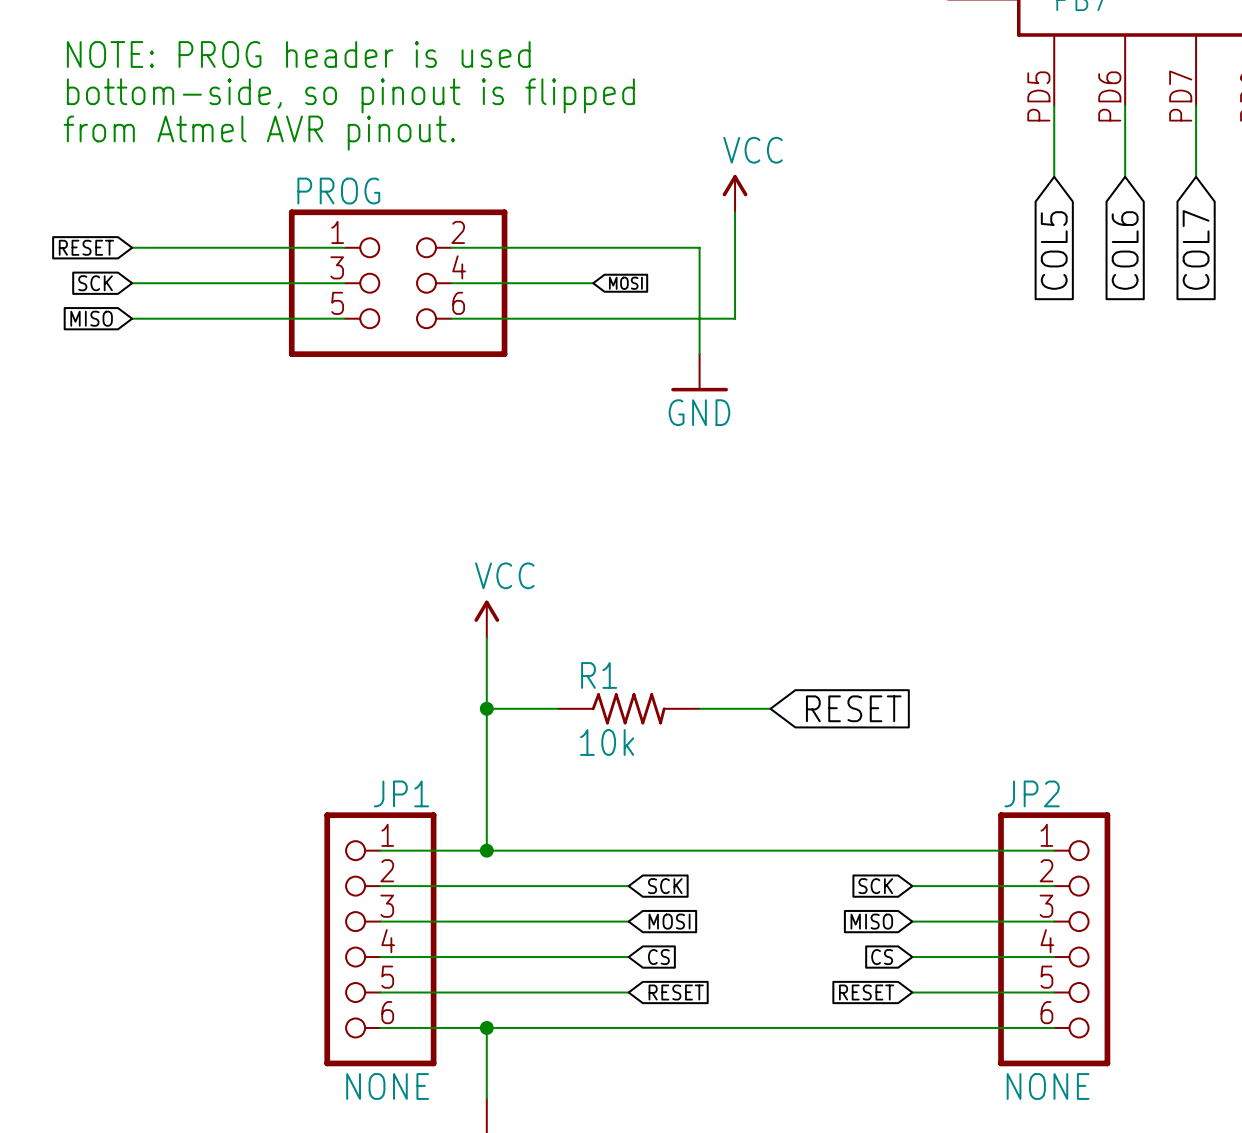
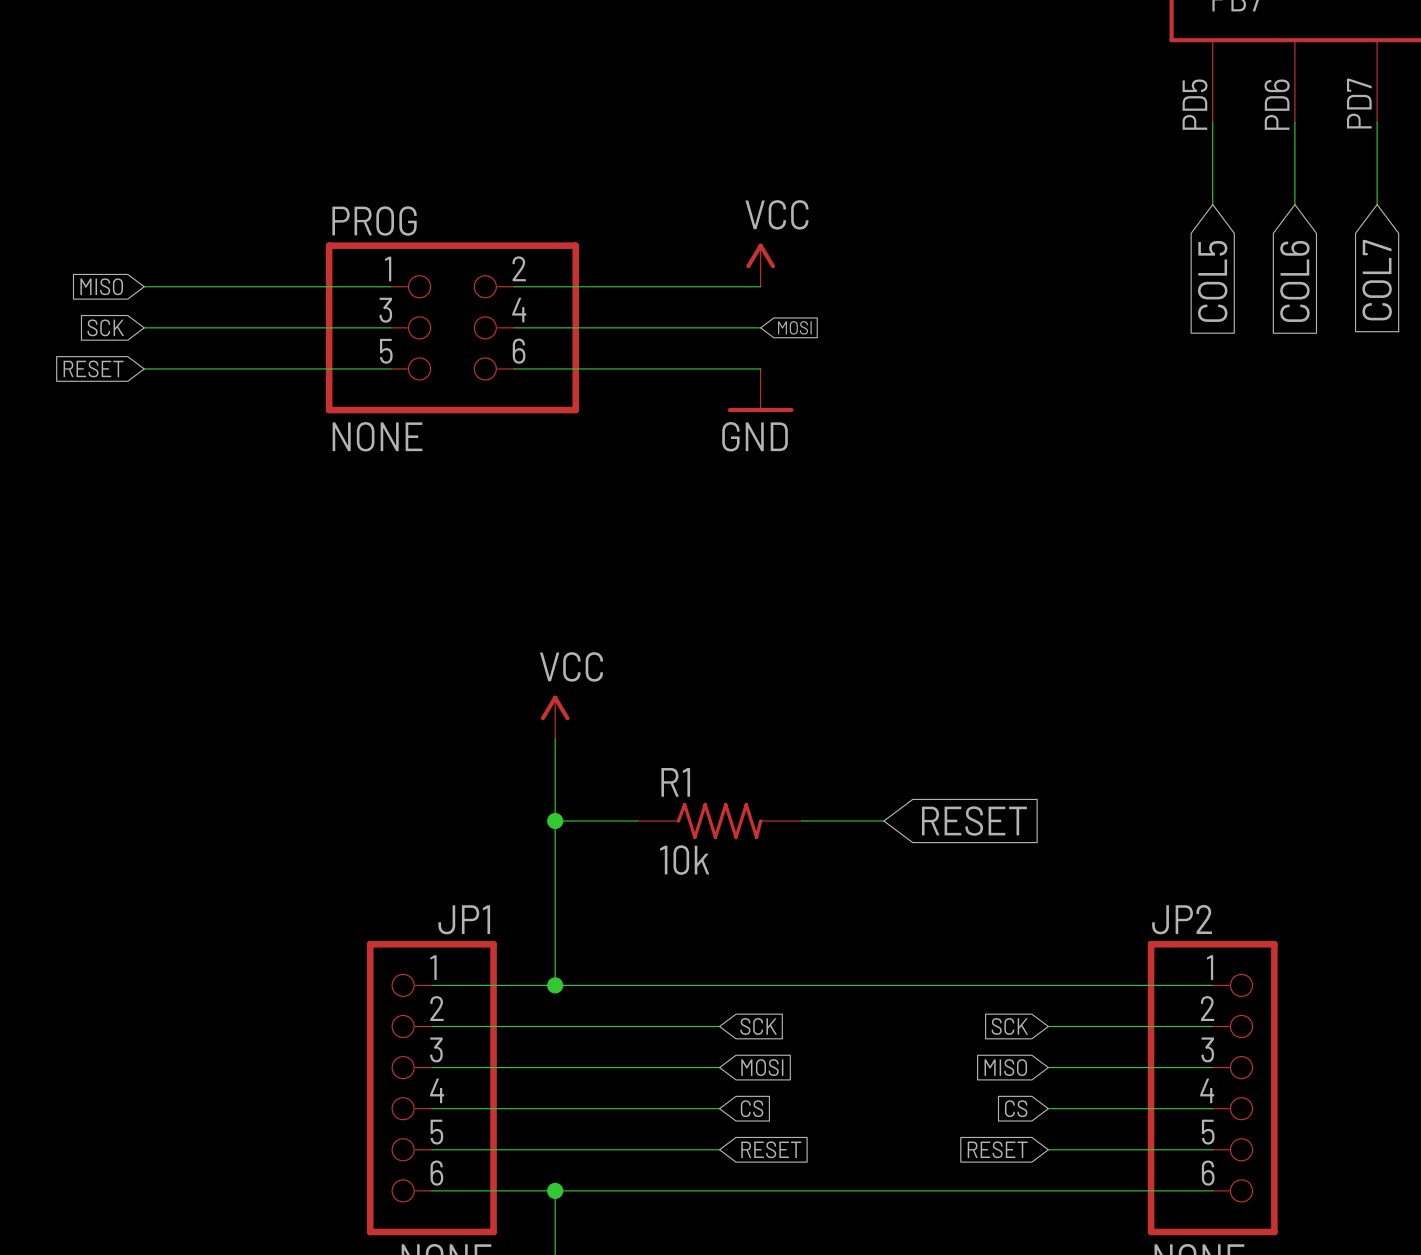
text: NOTE: PROG header is used (298, 54) -> none
text: bottom-side, so pinout is flipped (350, 95) -> none
text: from Atmel AVR pinout. (259, 133) -> none
power symbol position: VCC (735, 193) -> VCC (760, 265)
wire: (735, 212) (735, 318) (664, 318) -> none
global label: RESET (86, 247) -> MISO (101, 286)
wire: (664, 247) (699, 247) (699, 354) -> none
wire: none -> (678, 327) (760, 327)
global label position: MOSI (625, 283) -> MOSI (794, 327)
global label: MISO (91, 318) -> RESET (93, 368)
power symbol position: GND (699, 372) -> GND (760, 390)
PROG value: none -> NONE (377, 436)

